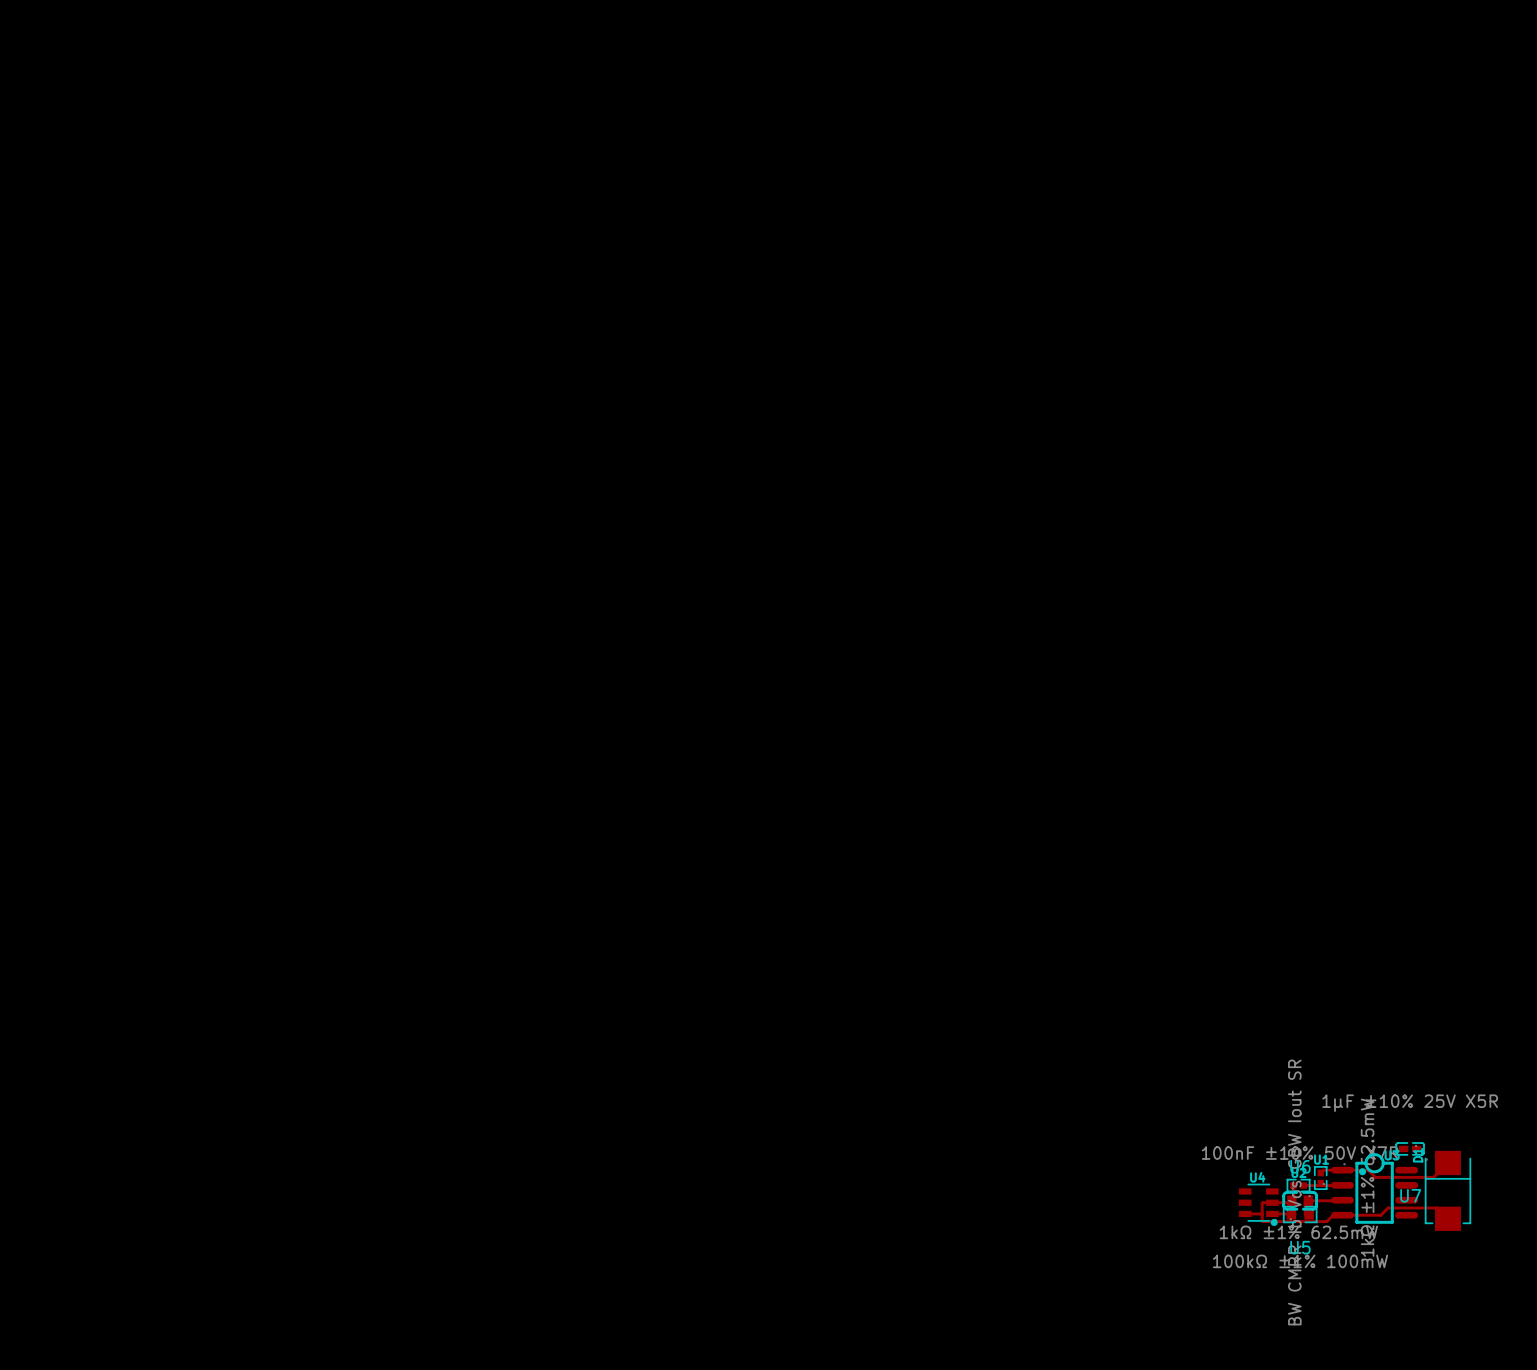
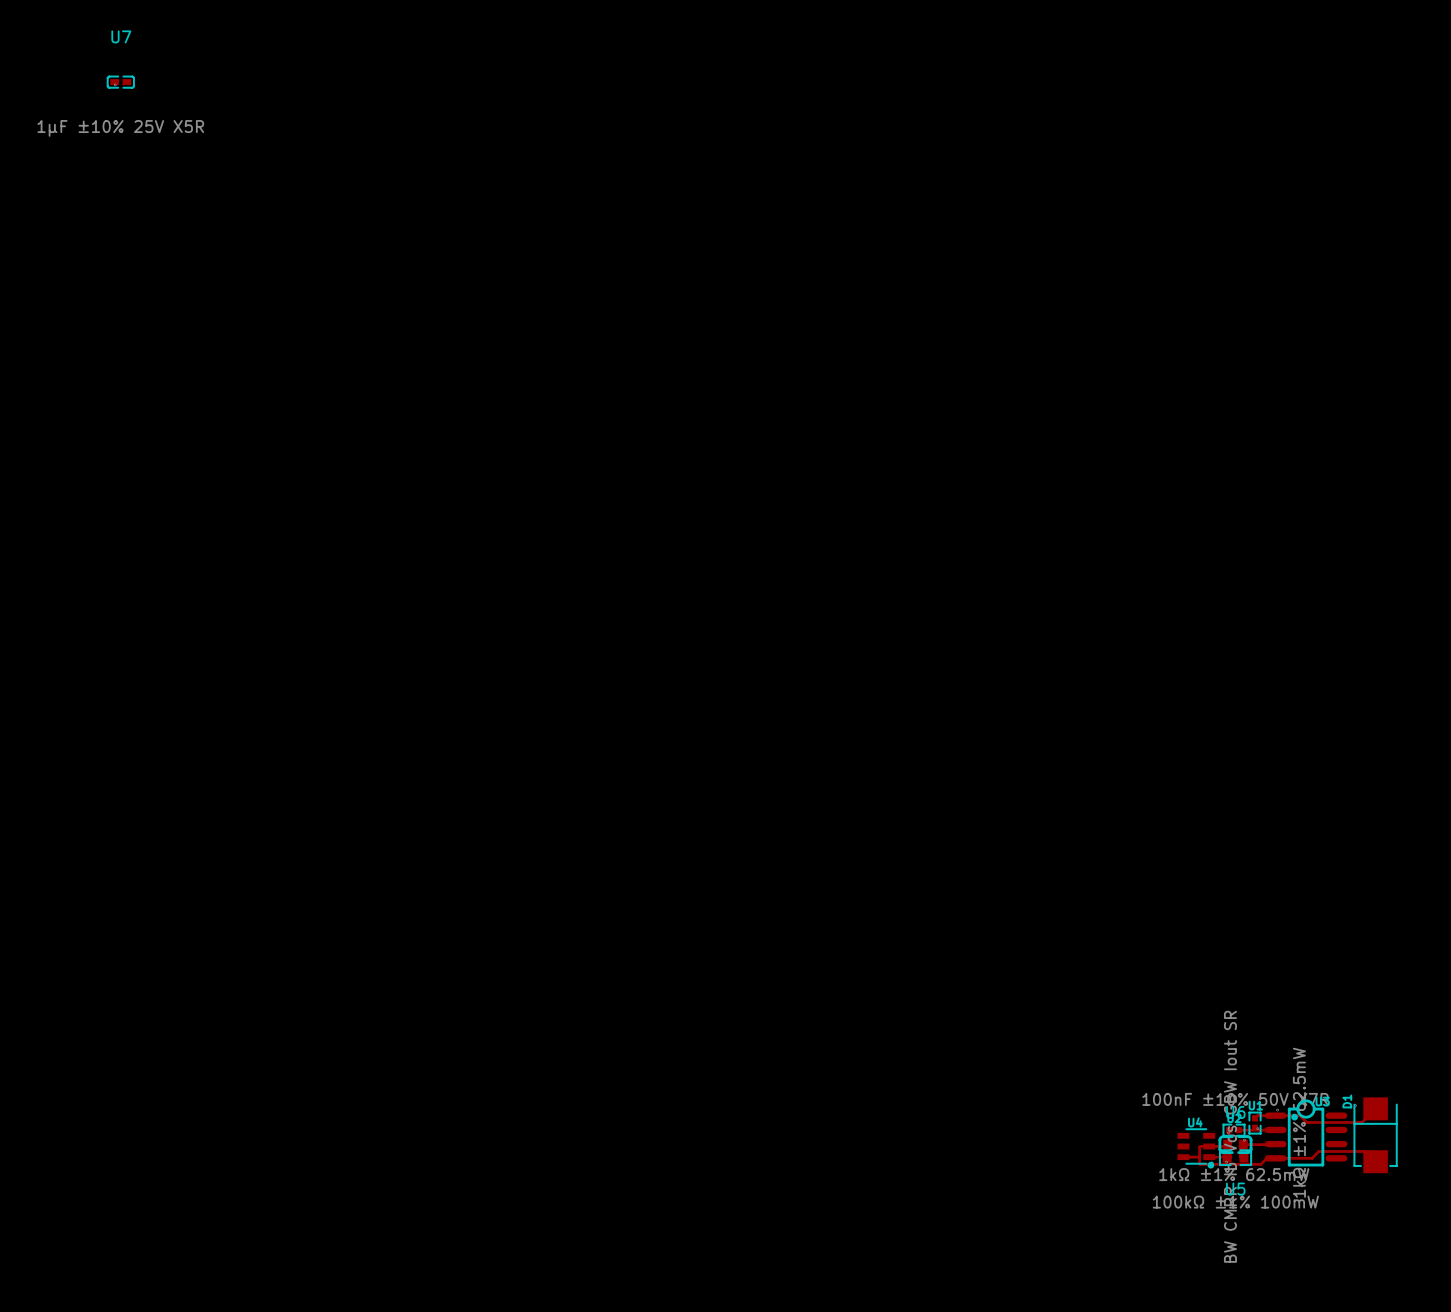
U7 rotation: 0° (1410, 1148) -> 180° (120, 82)
U7 position: (1410, 1148) -> (120, 82)

